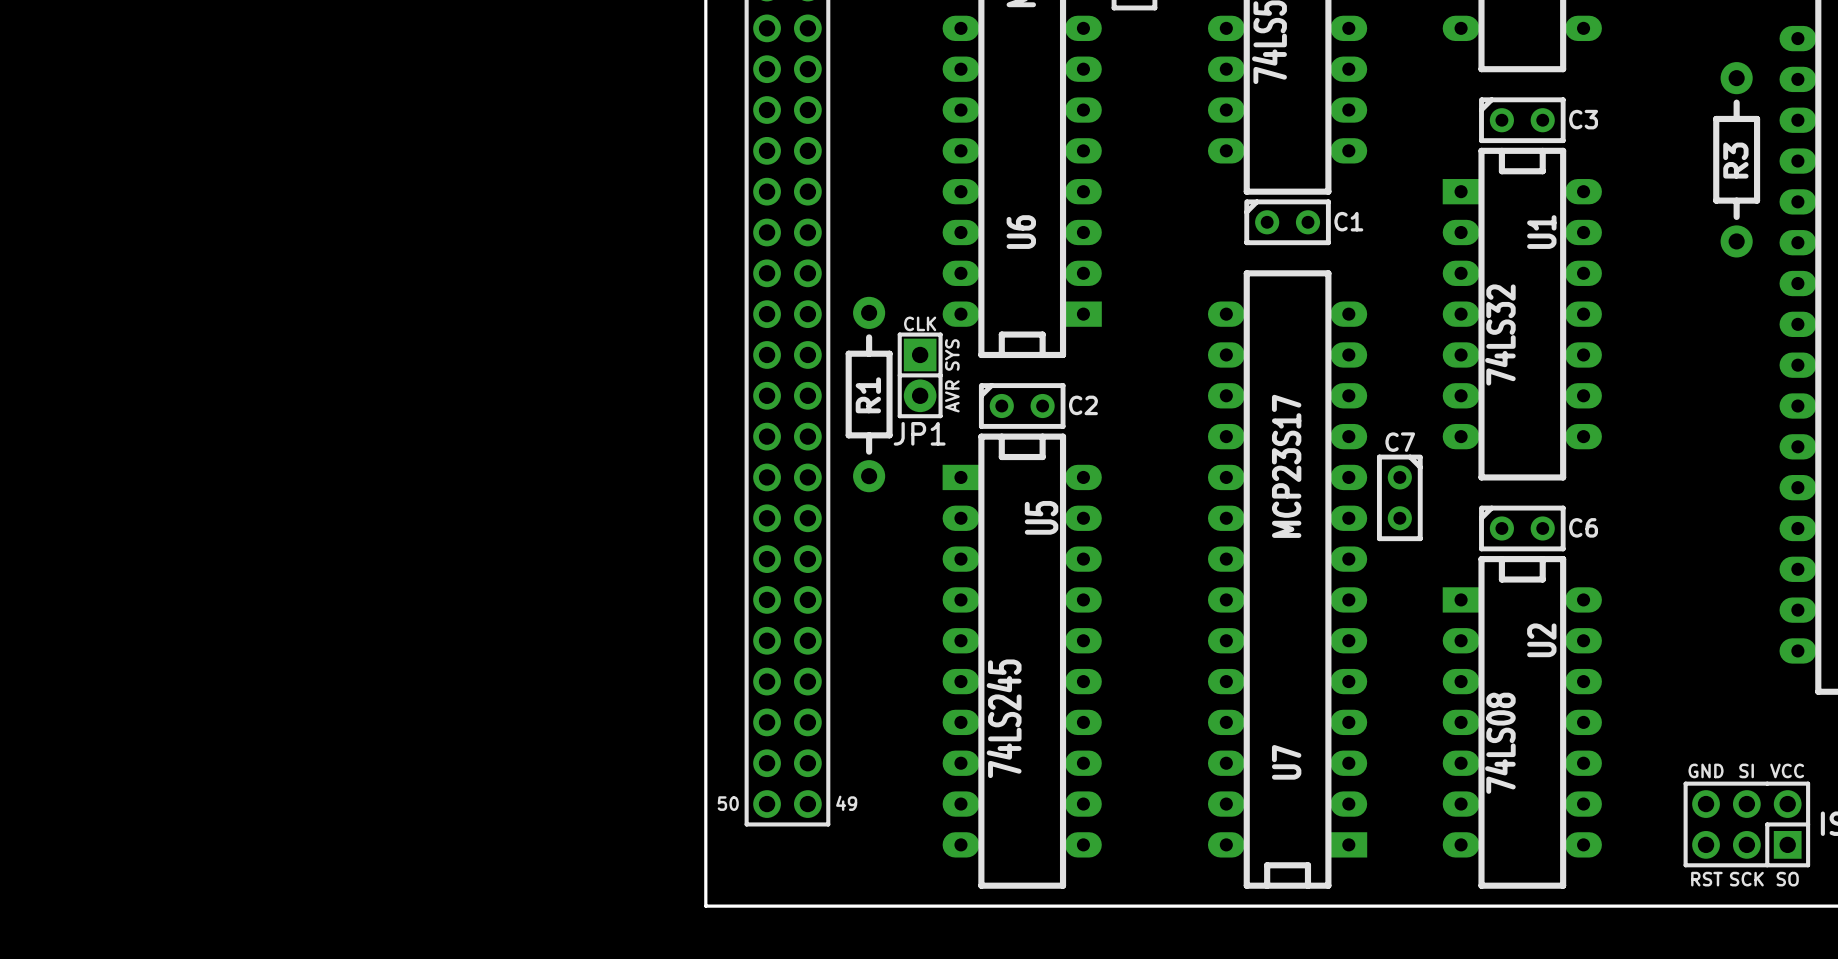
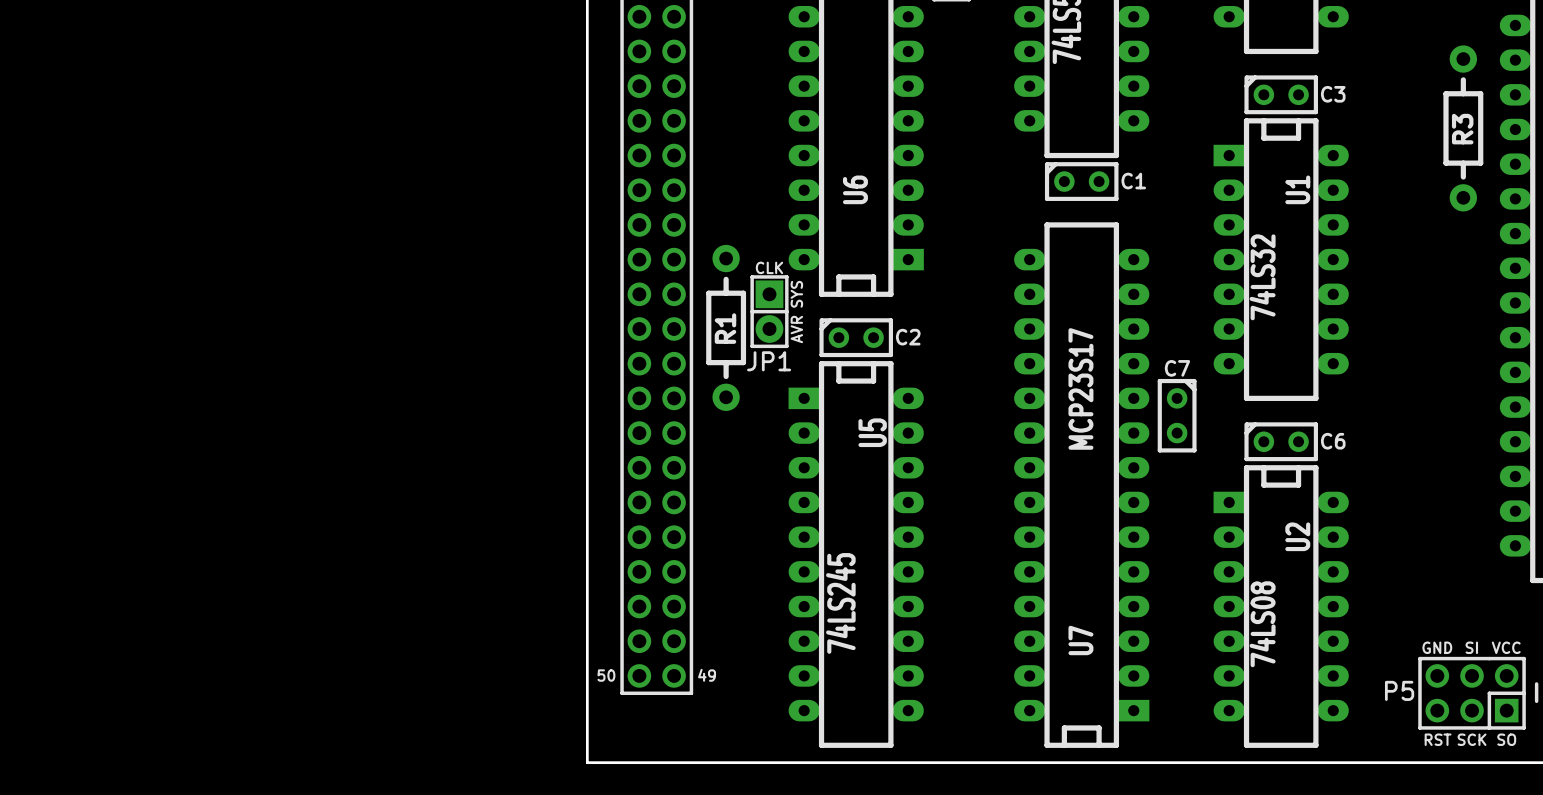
P5 name: none -> P5 (1399, 690)

